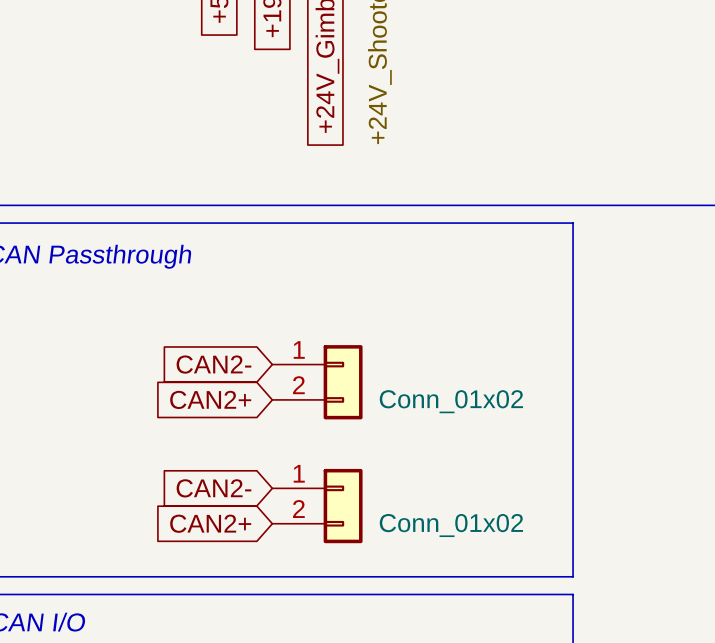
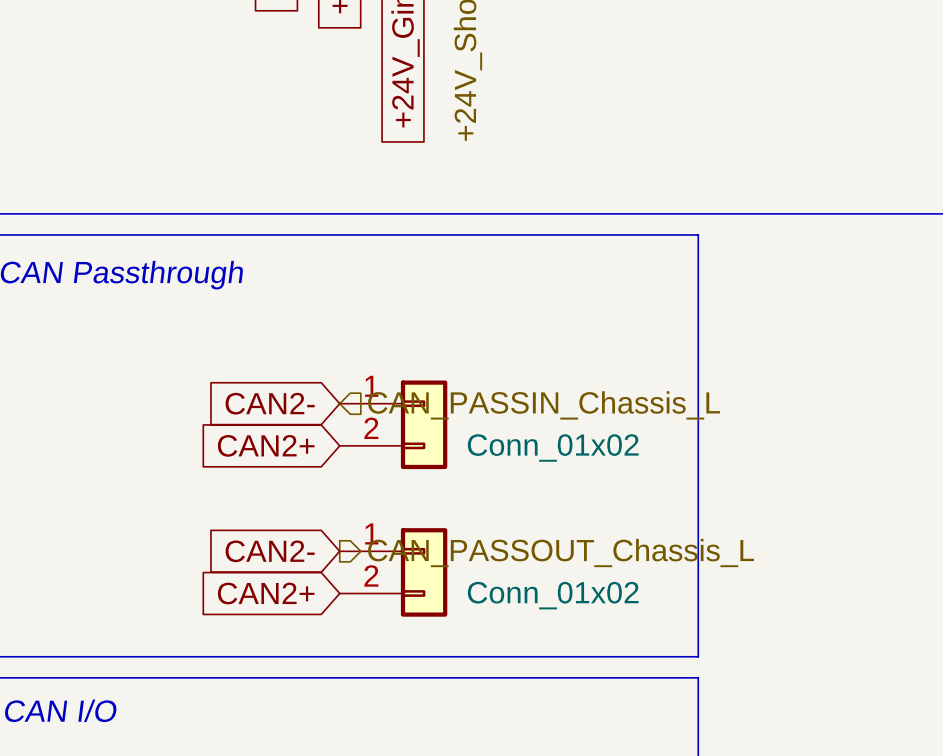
hierarchical label: none -> CAN_PASSIN_Chassis_L (543, 405)
hierarchical label: none -> CAN_PASSOUT_Chassis_L (561, 553)

